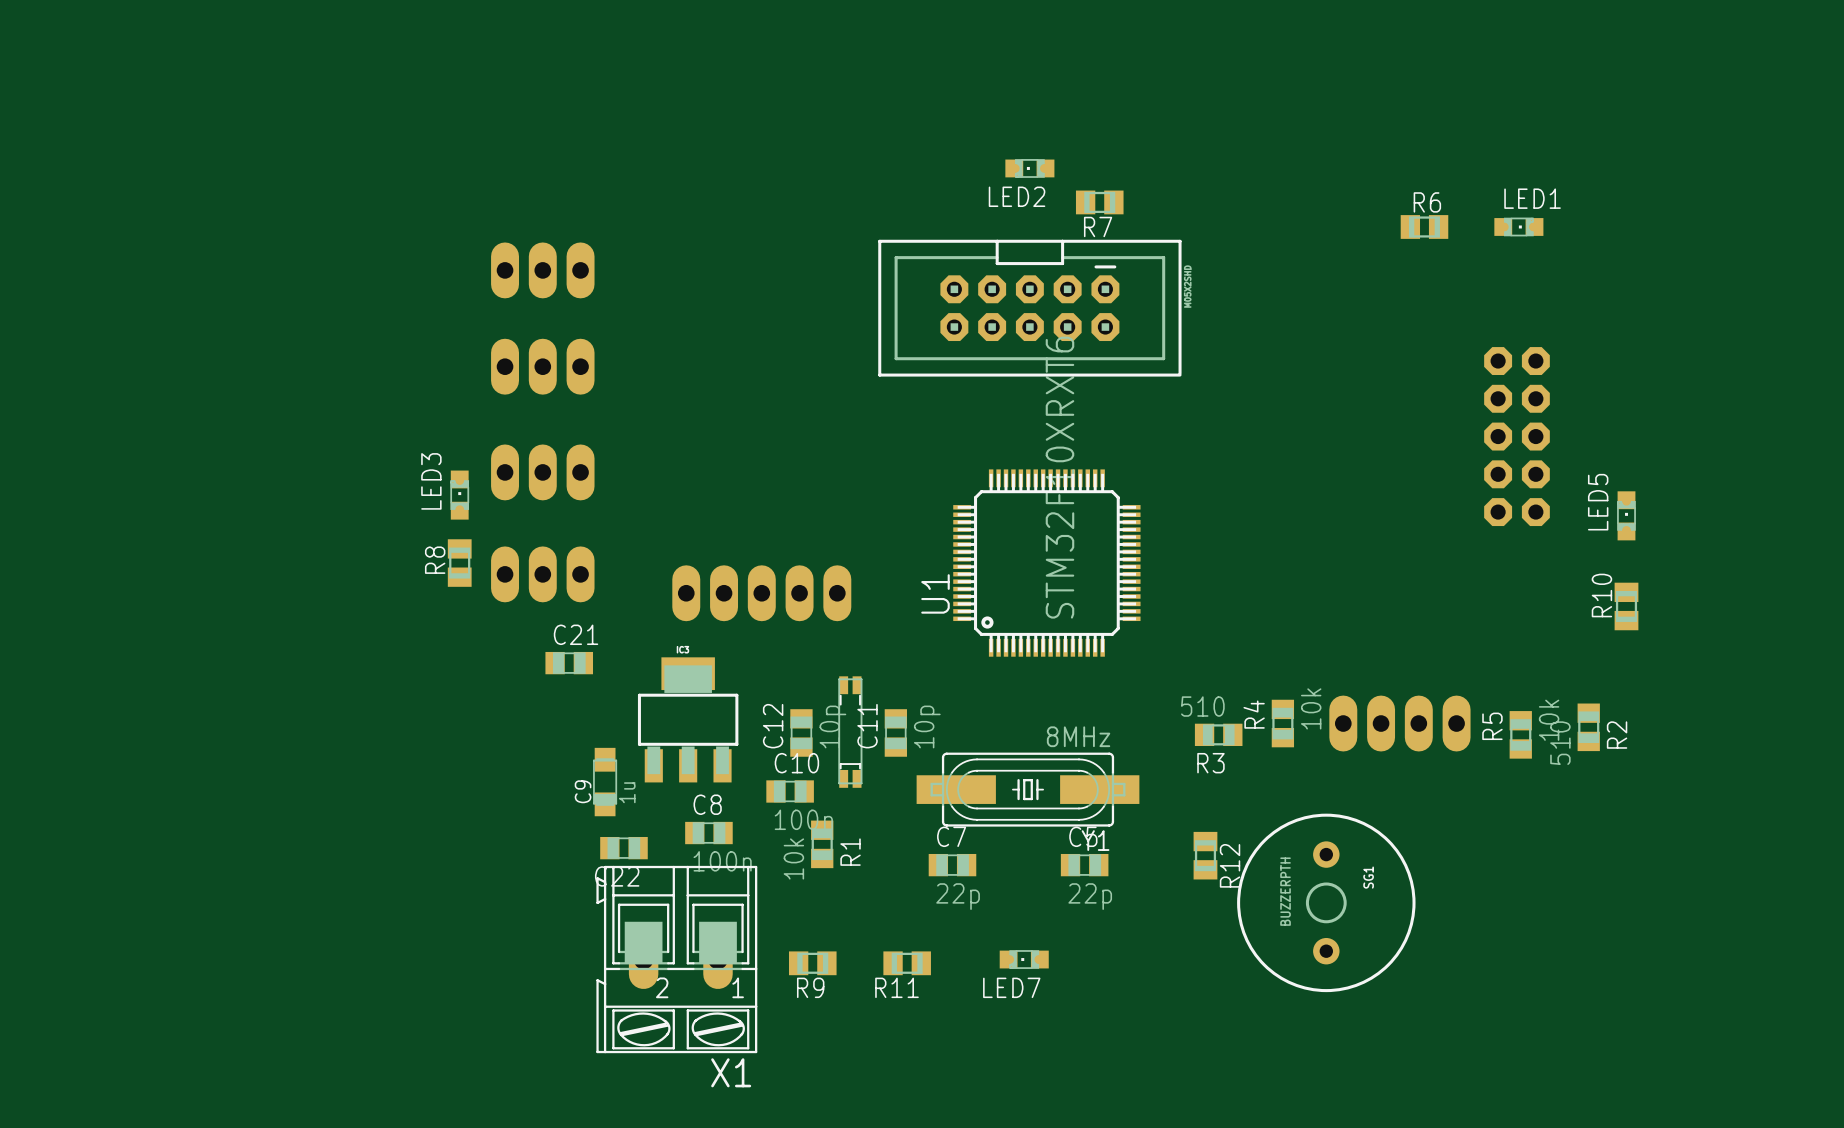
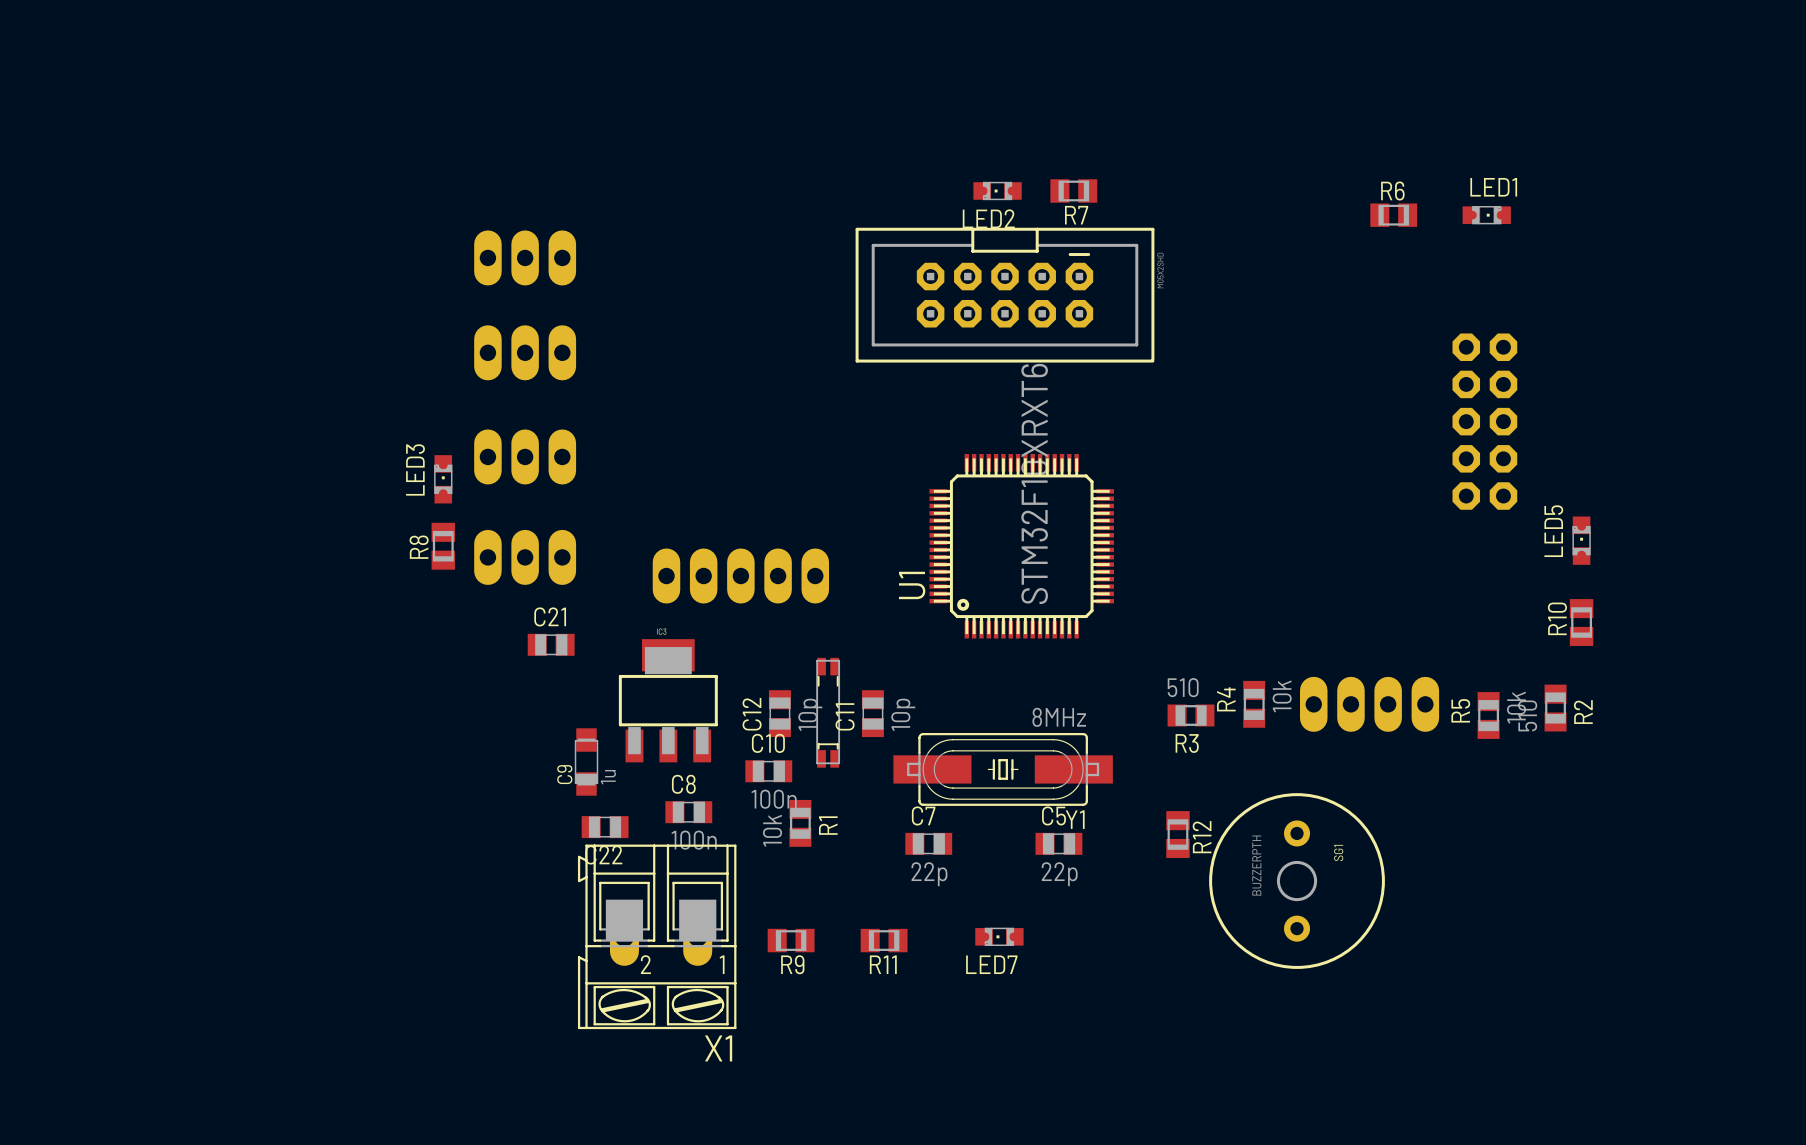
LED2 position: (1029, 168) -> (997, 190)
LED5 position: (1626, 515) -> (1581, 540)
R10 position: (1626, 606) -> (1581, 622)

